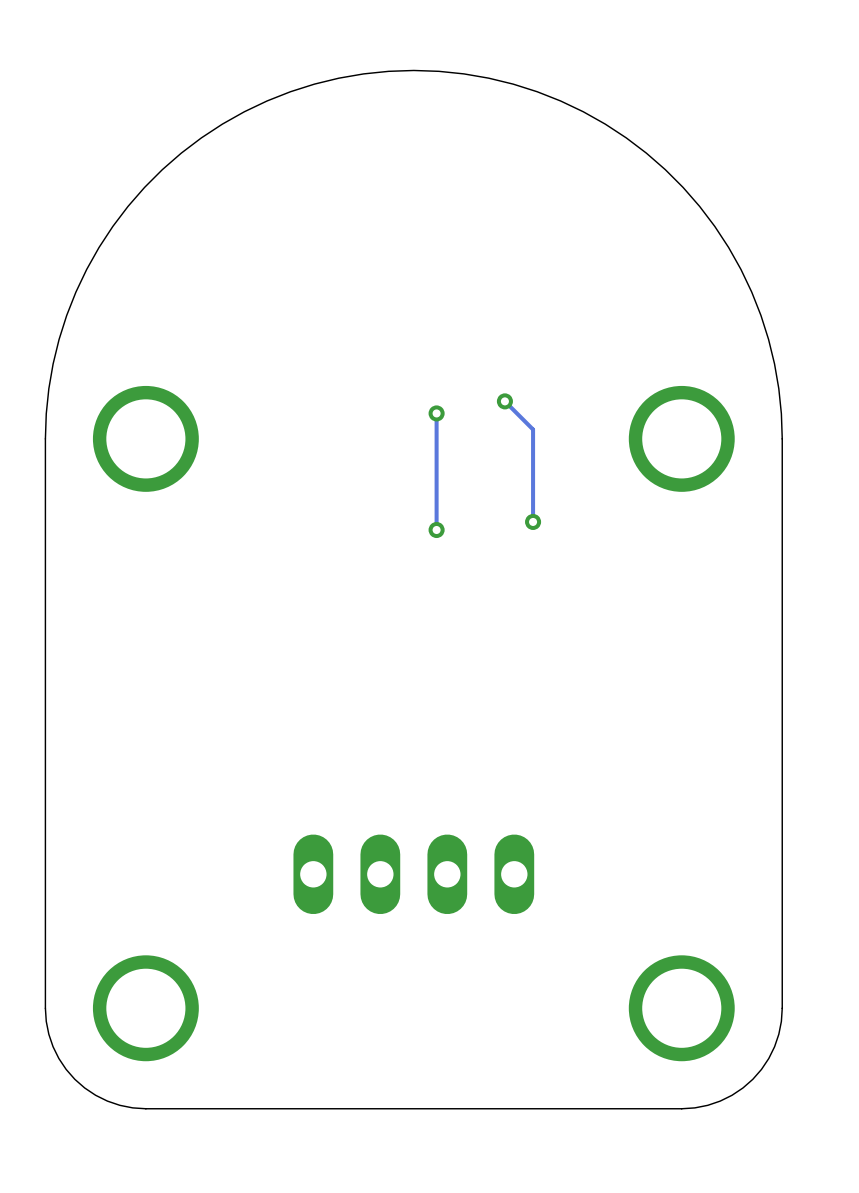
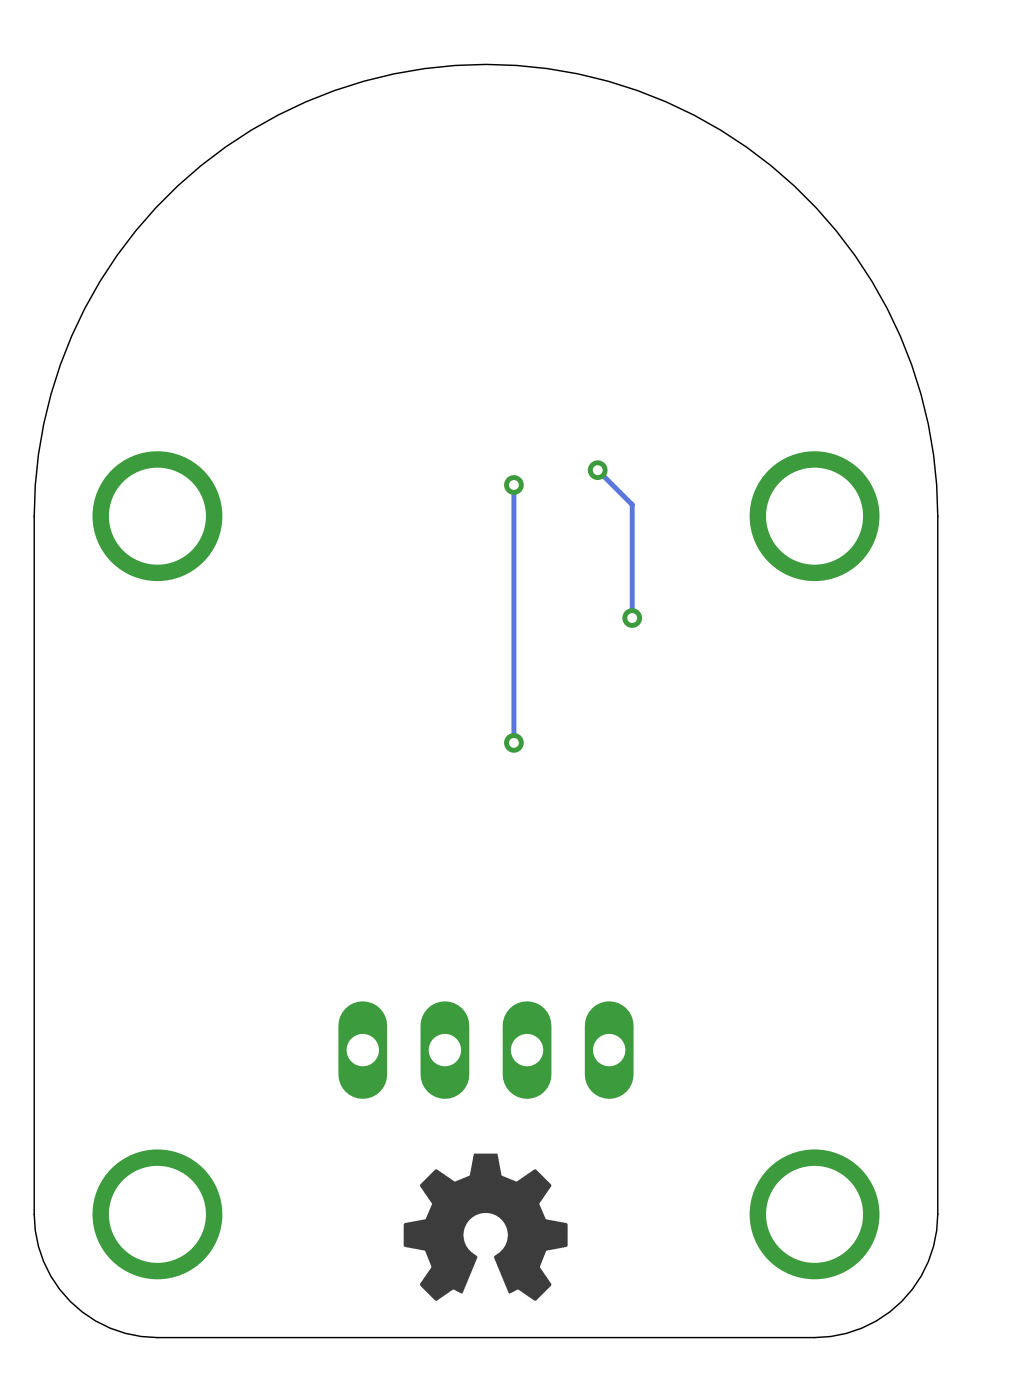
track: none -> (513, 627) (513, 742)
via position: (436, 529) -> (513, 742)
drawing: none -> [403, 1153, 568, 1301]

